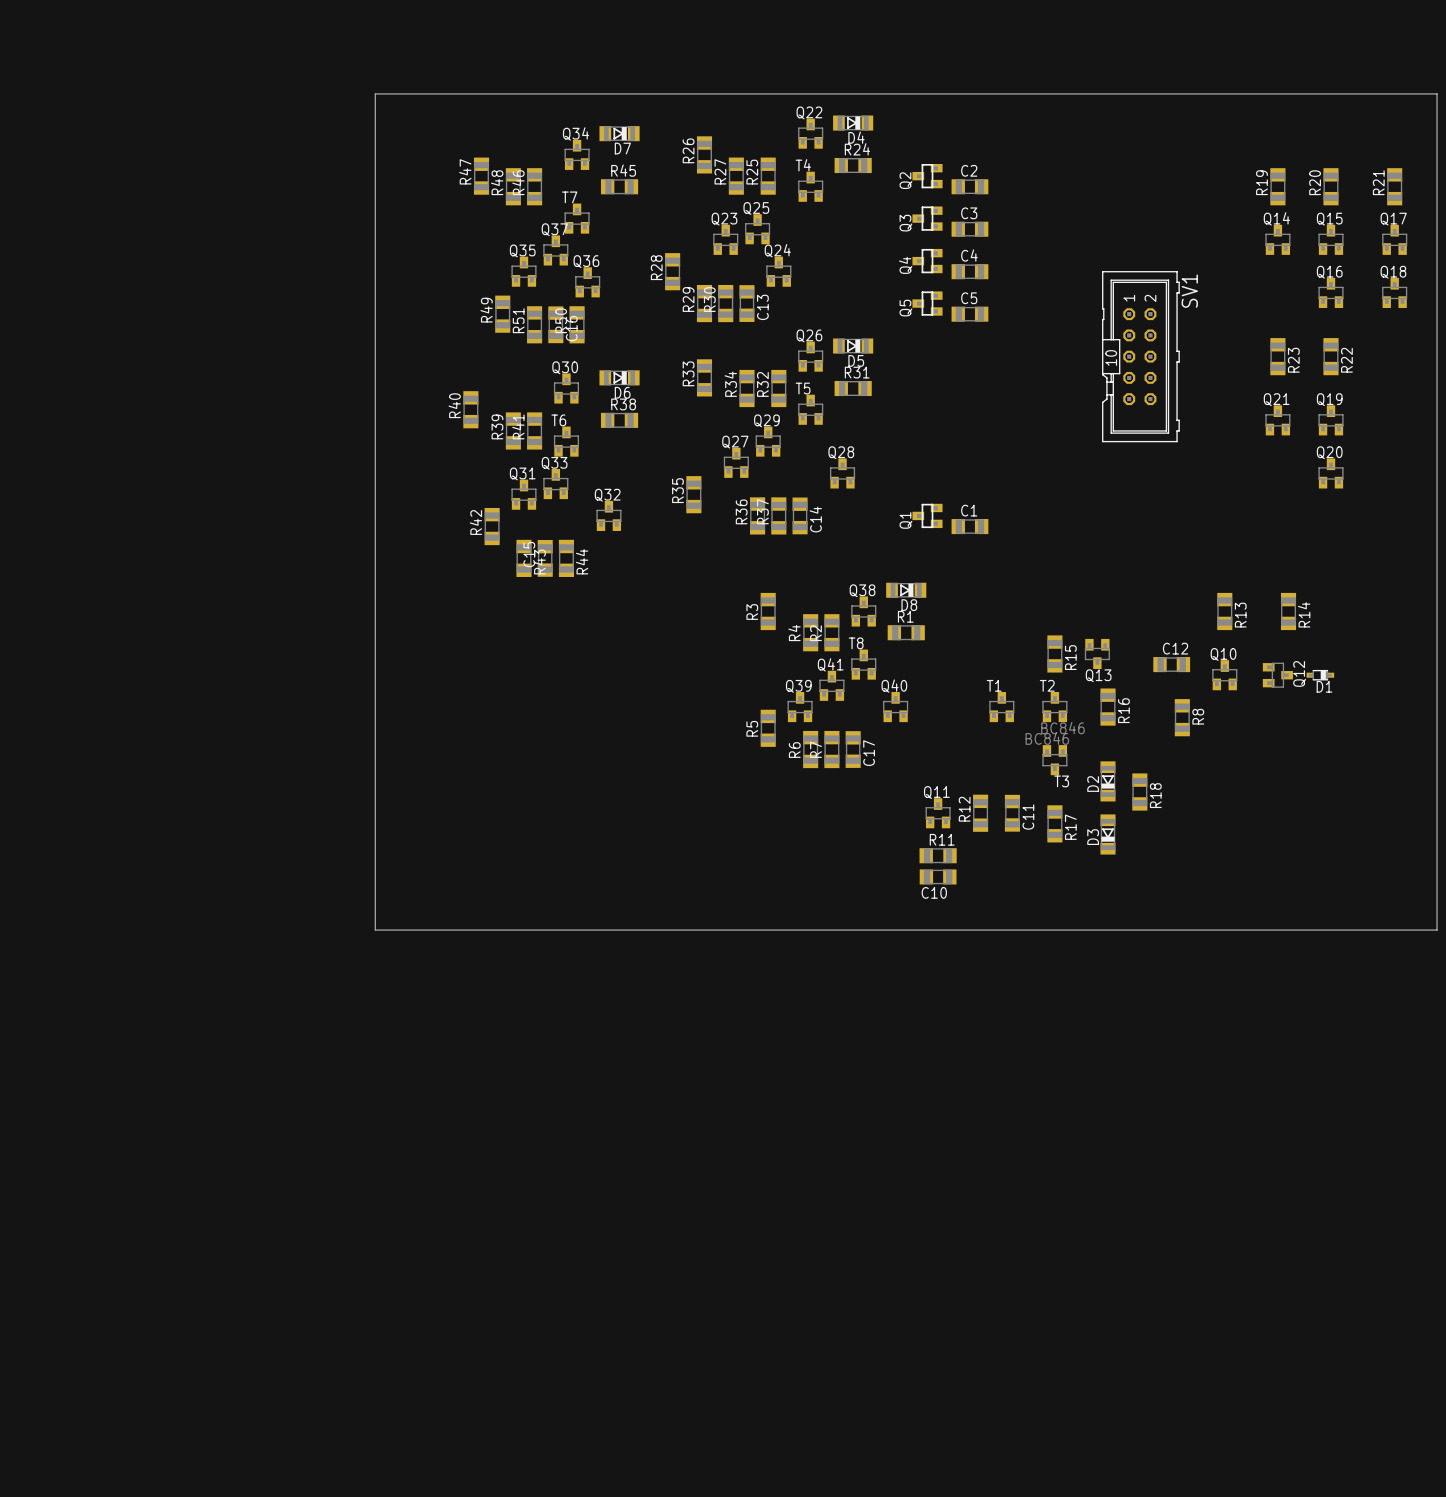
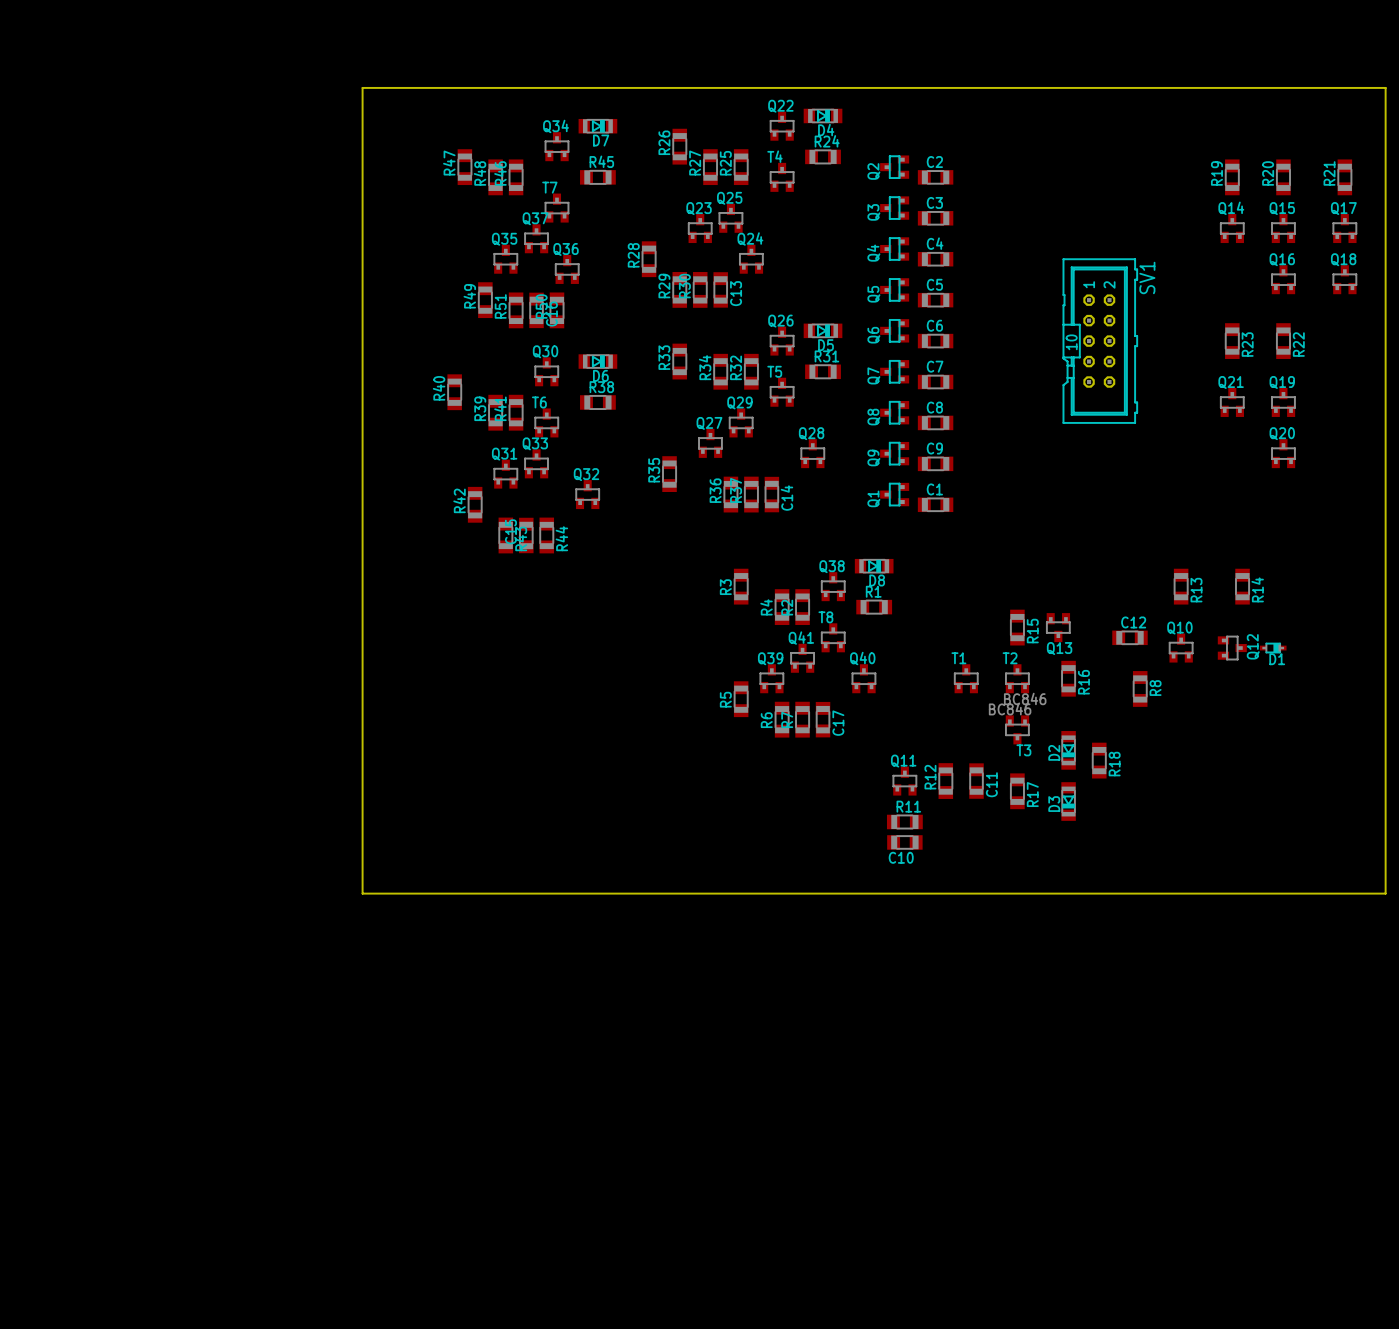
Q6: none -> (894, 330)
C6: none -> (935, 341)
Q7: none -> (894, 371)
C7: none -> (935, 382)
Q8: none -> (894, 412)
C8: none -> (935, 422)
Q9: none -> (894, 453)
C9: none -> (935, 463)

